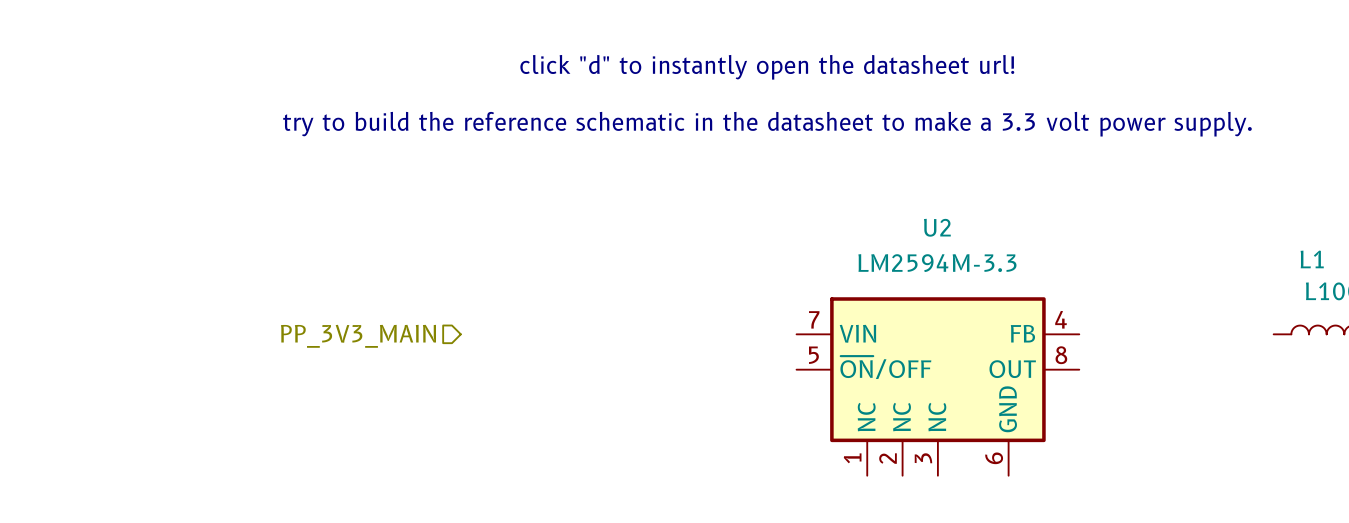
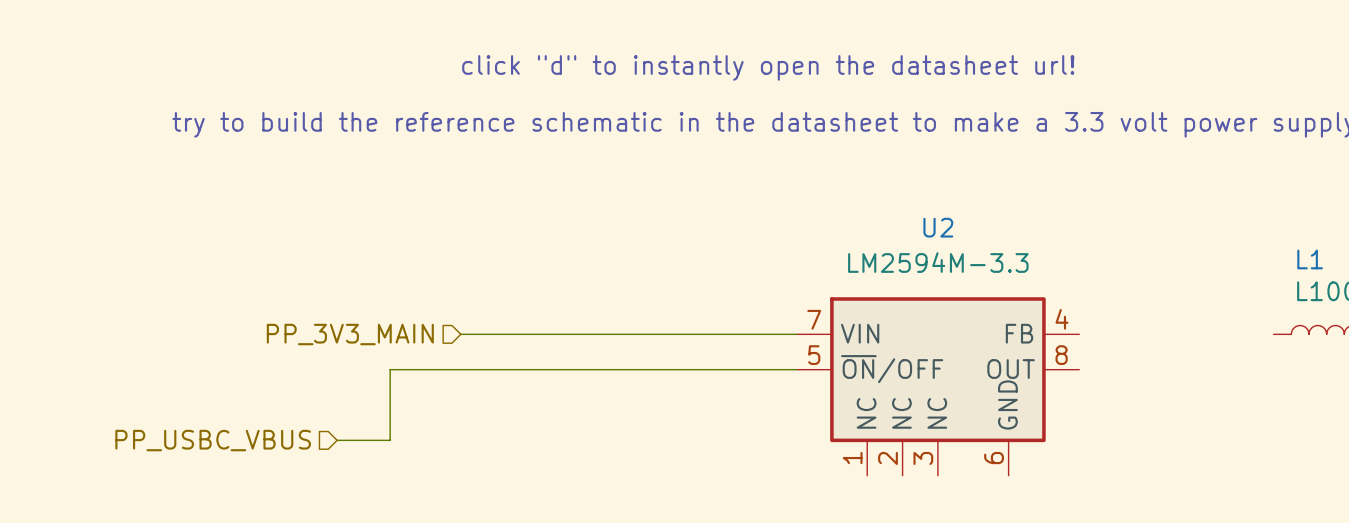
wire: none -> (460, 334) (796, 334)
wire: none -> (796, 369) (390, 369) (390, 440) (337, 440)
hierarchical label: none -> PP_USBC_VBUS (213, 440)

